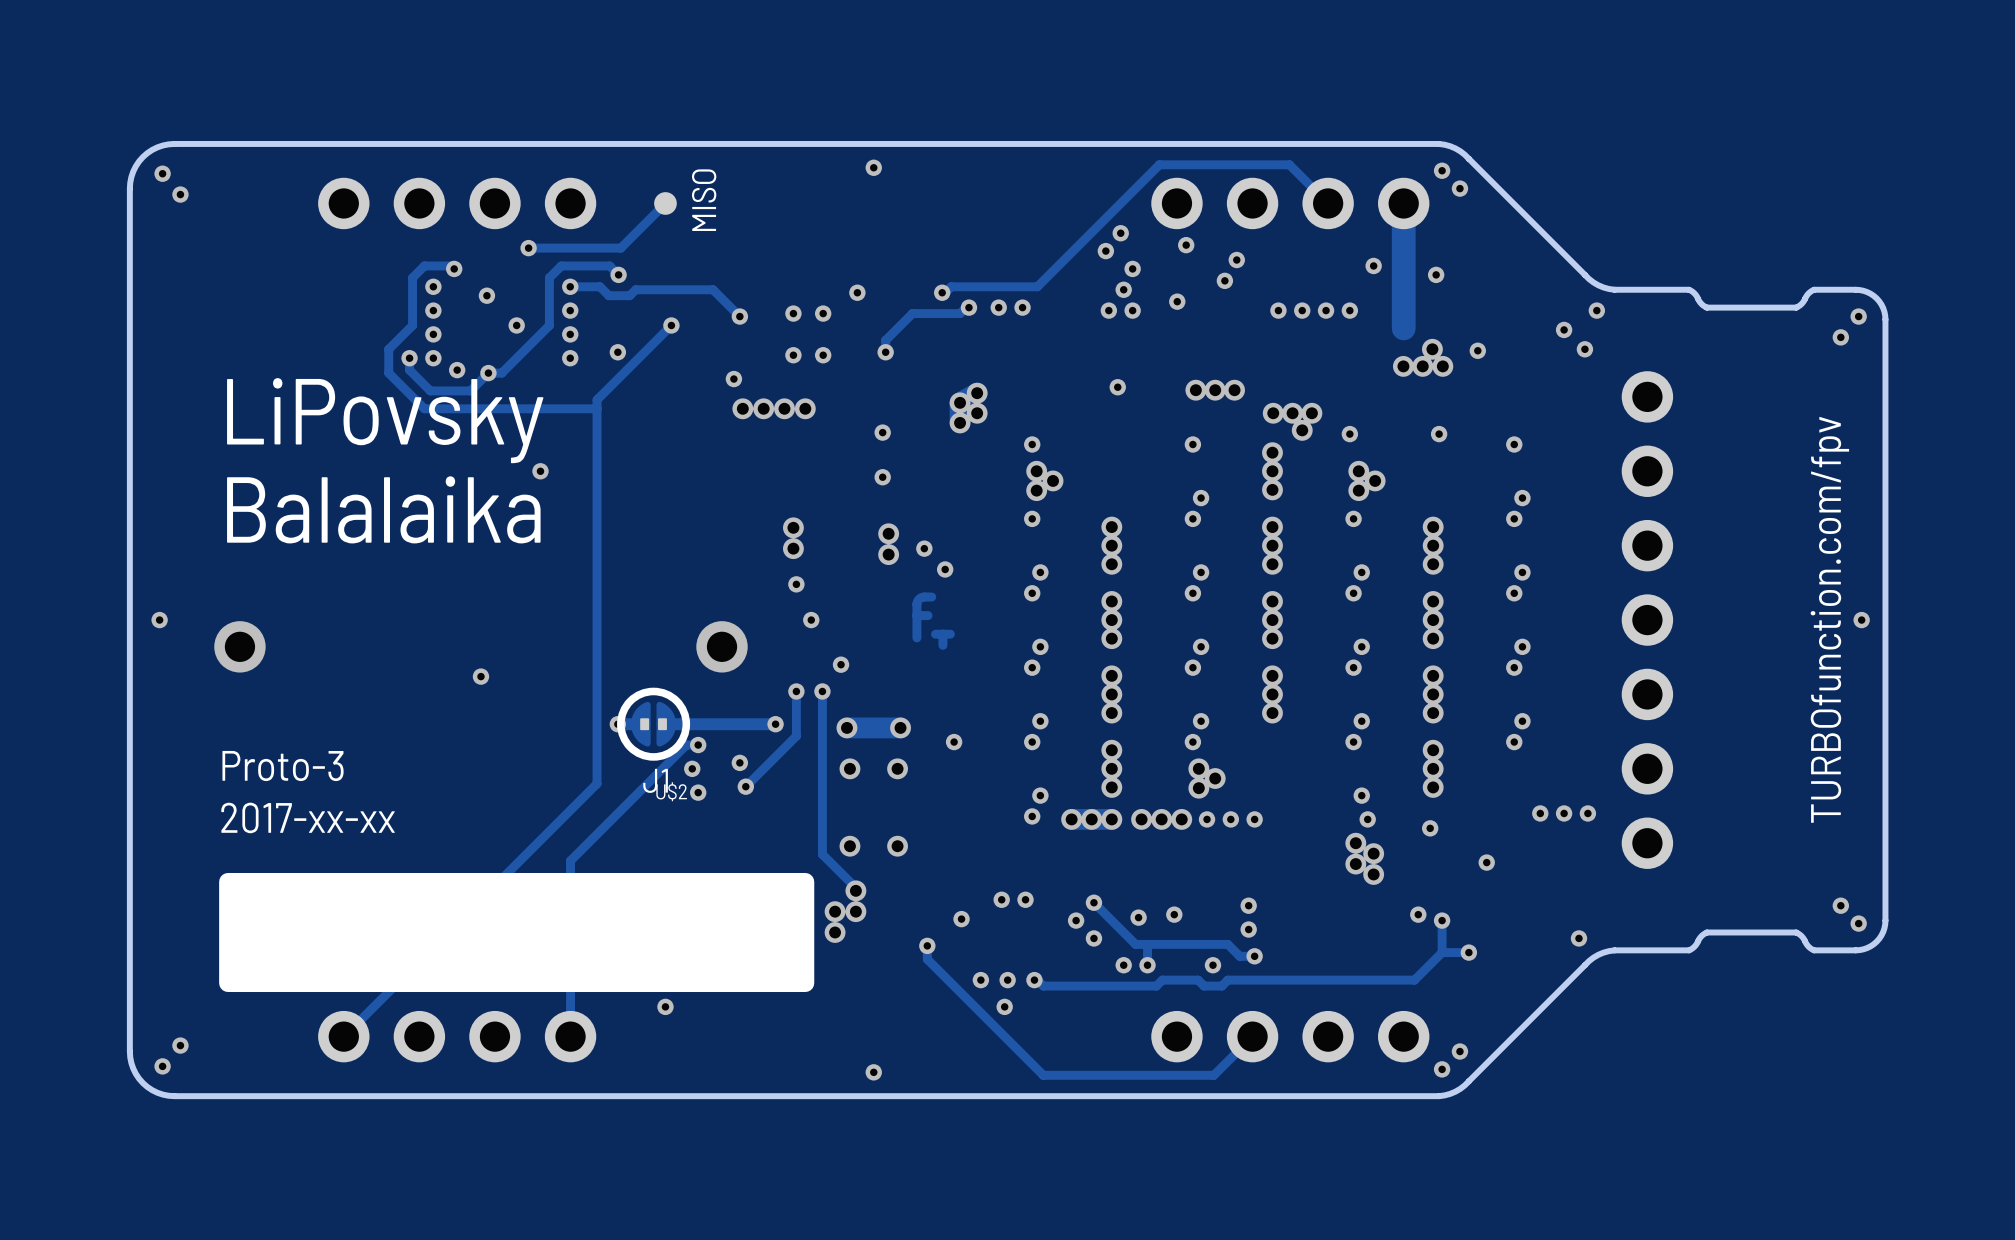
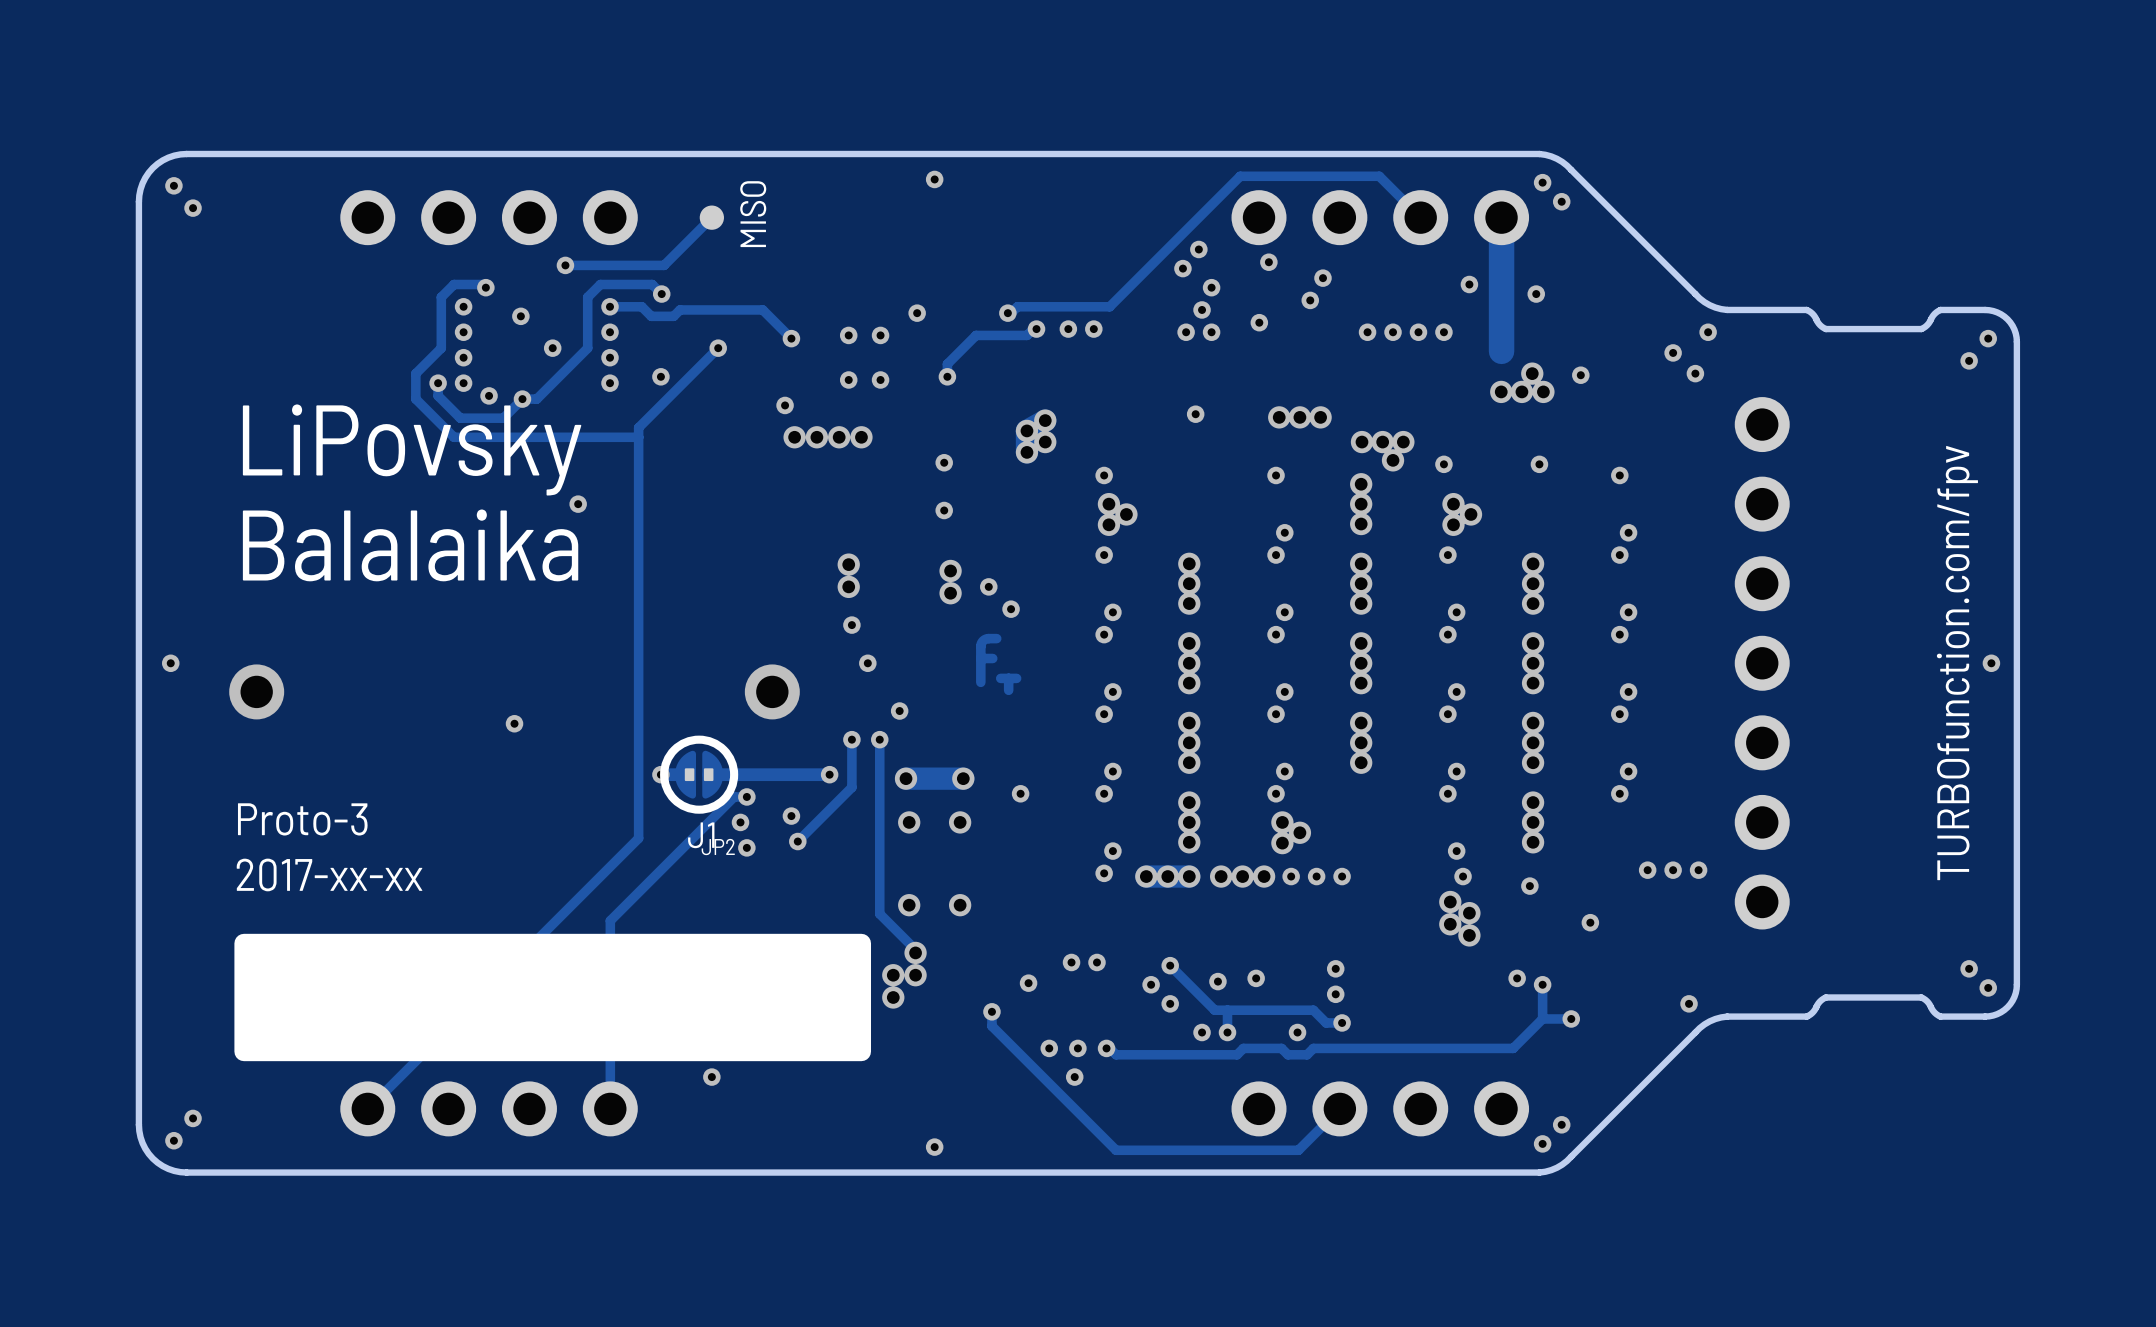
U$2 name: U$2 (671, 791) -> JP2 (718, 847)

